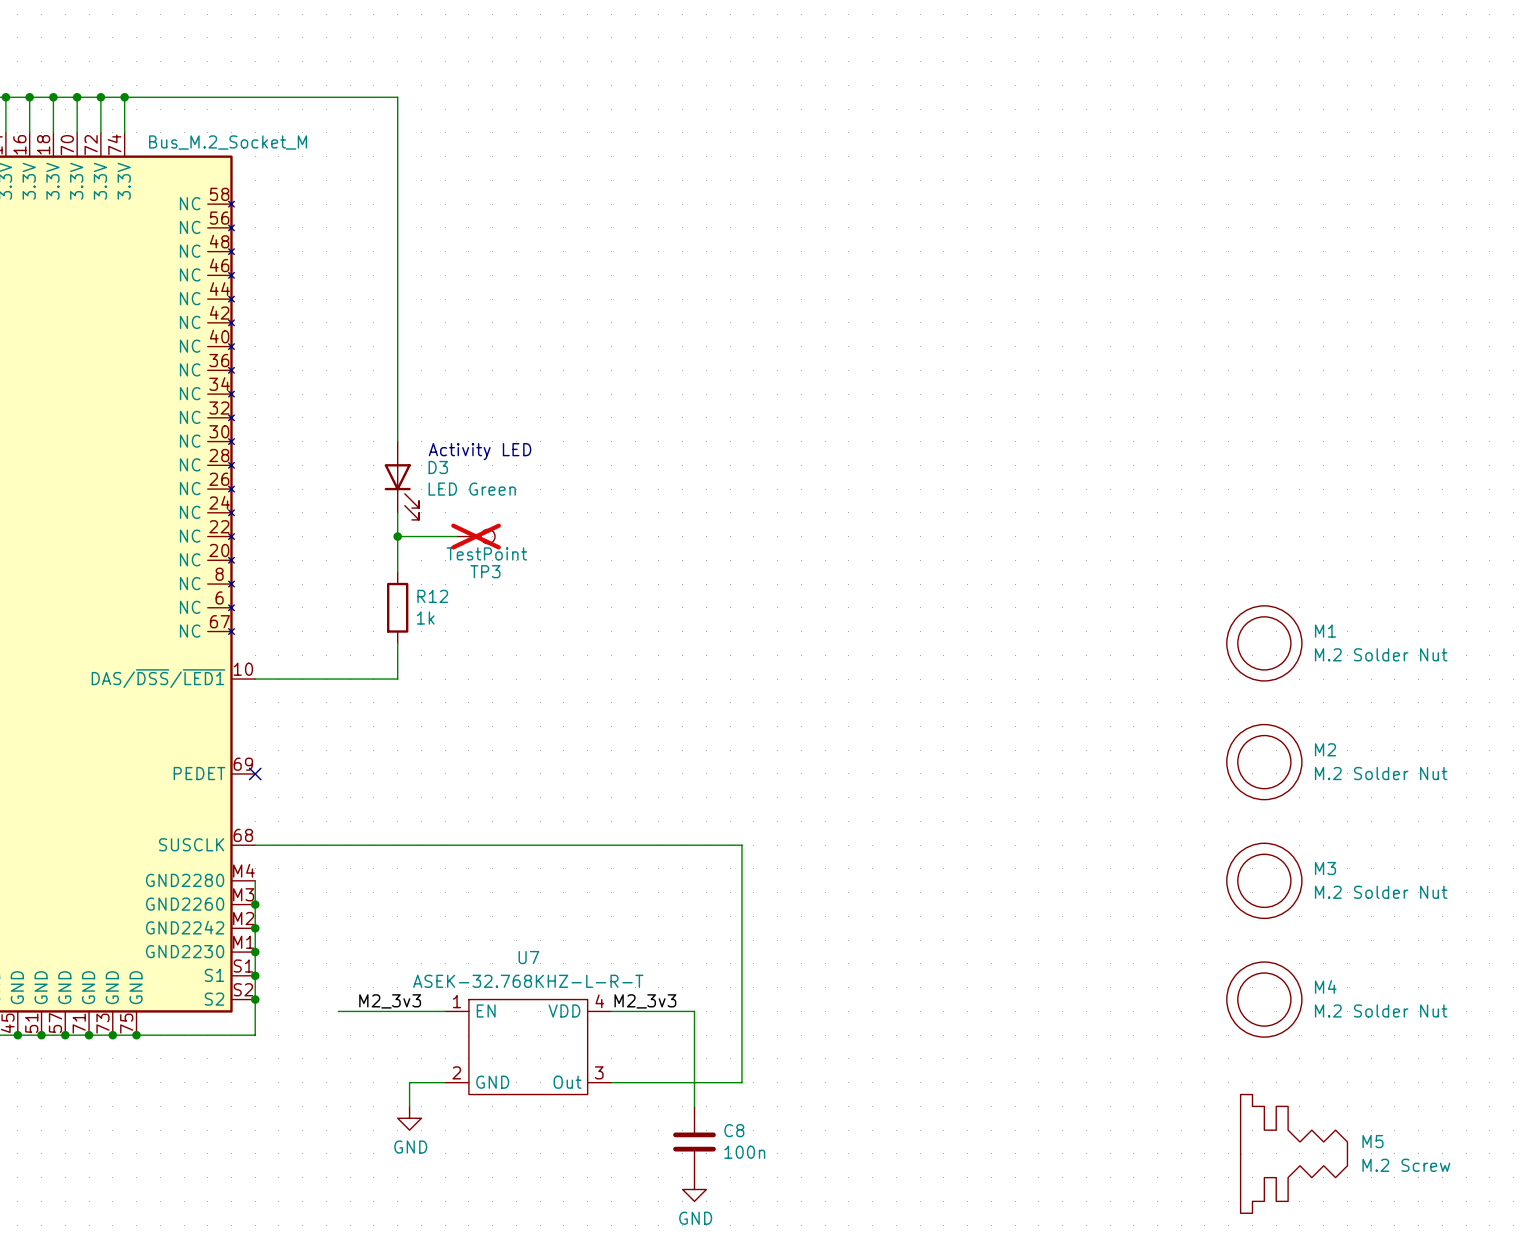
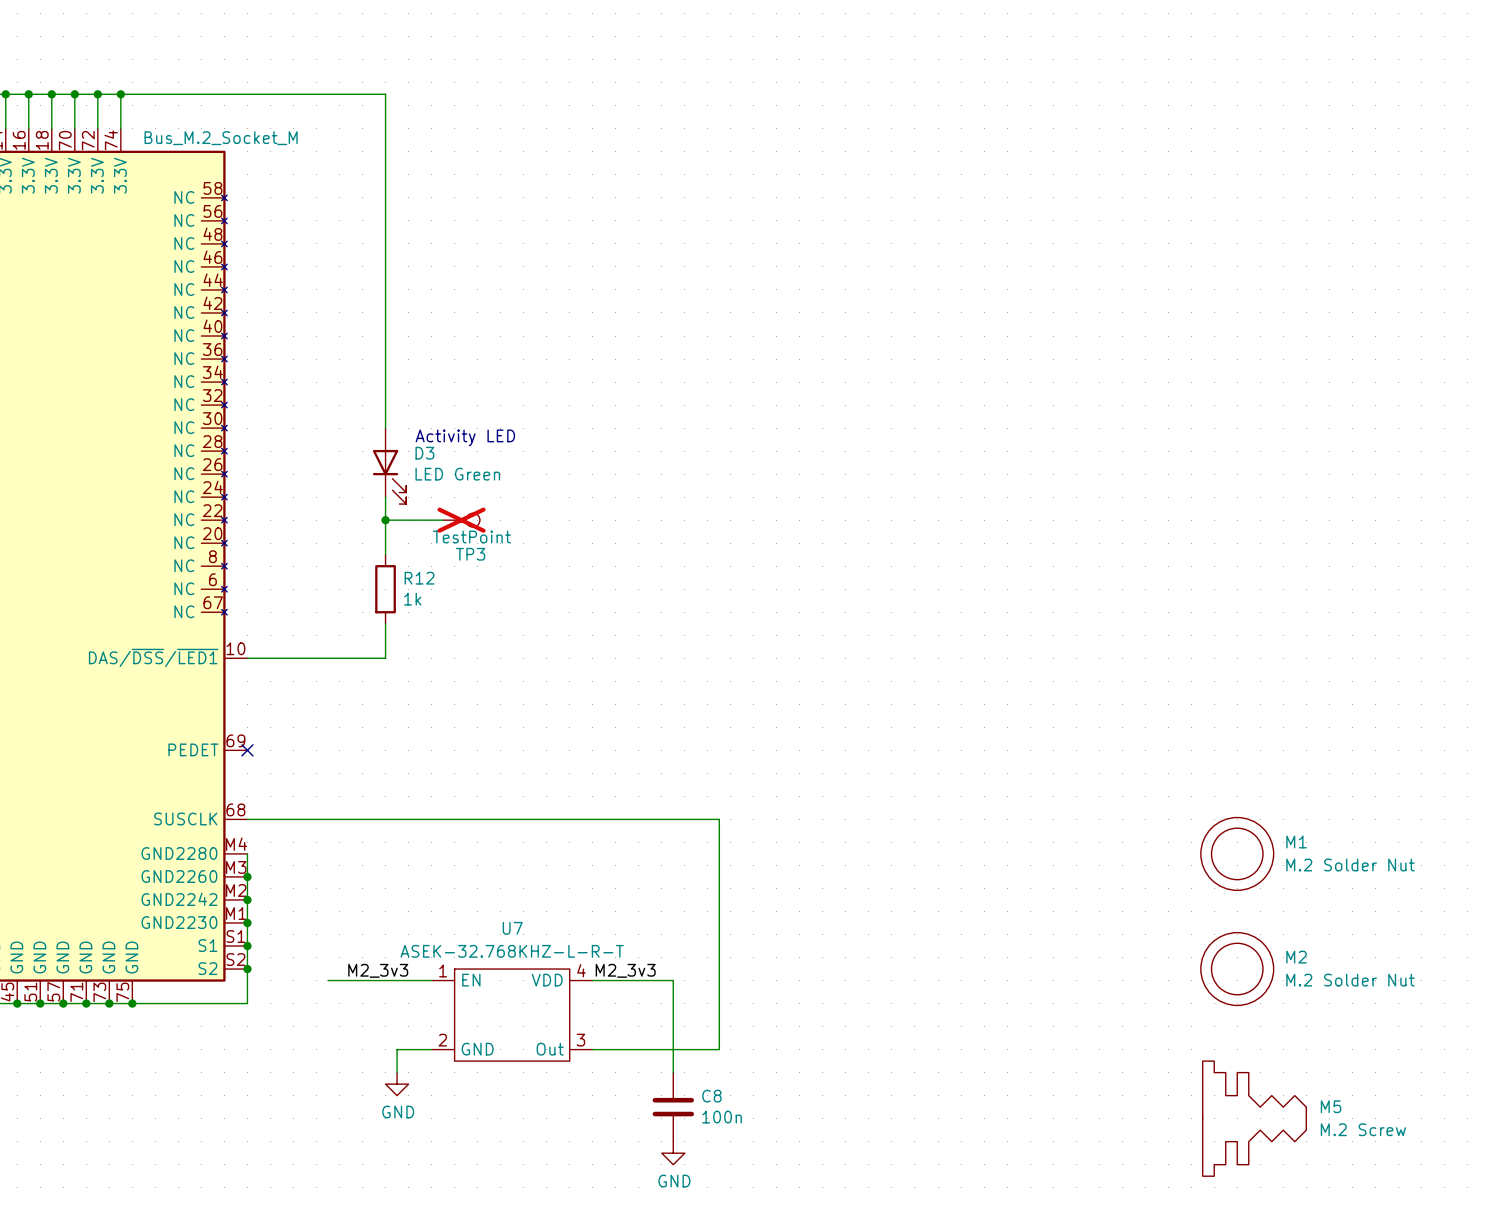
M1 position: (1264, 643) -> (1237, 853)
M2 position: (1264, 762) -> (1237, 969)
M3: M.2 Solder Nut (1264, 880) -> none
M4: M.2 Solder Nut (1264, 999) -> none

